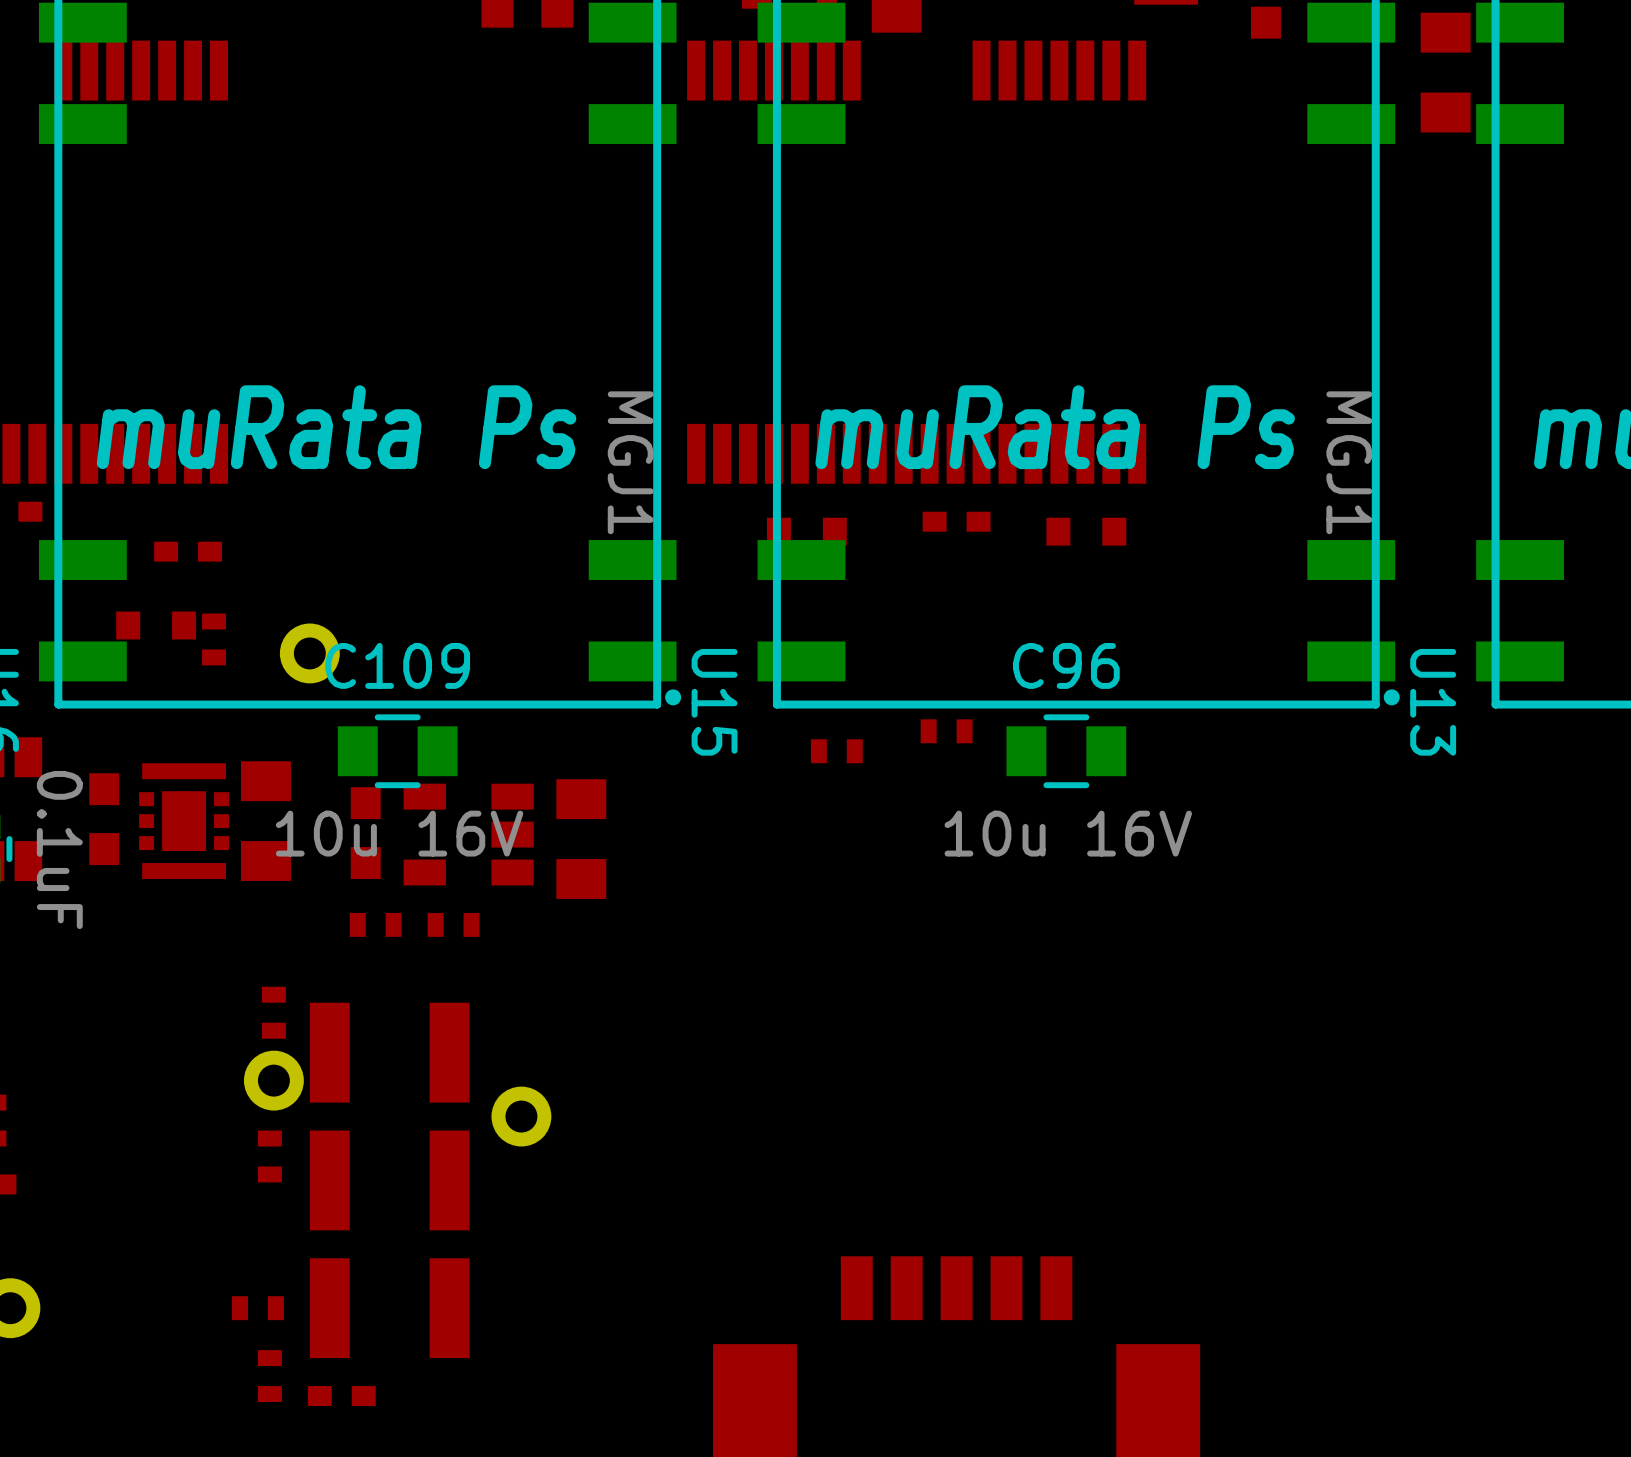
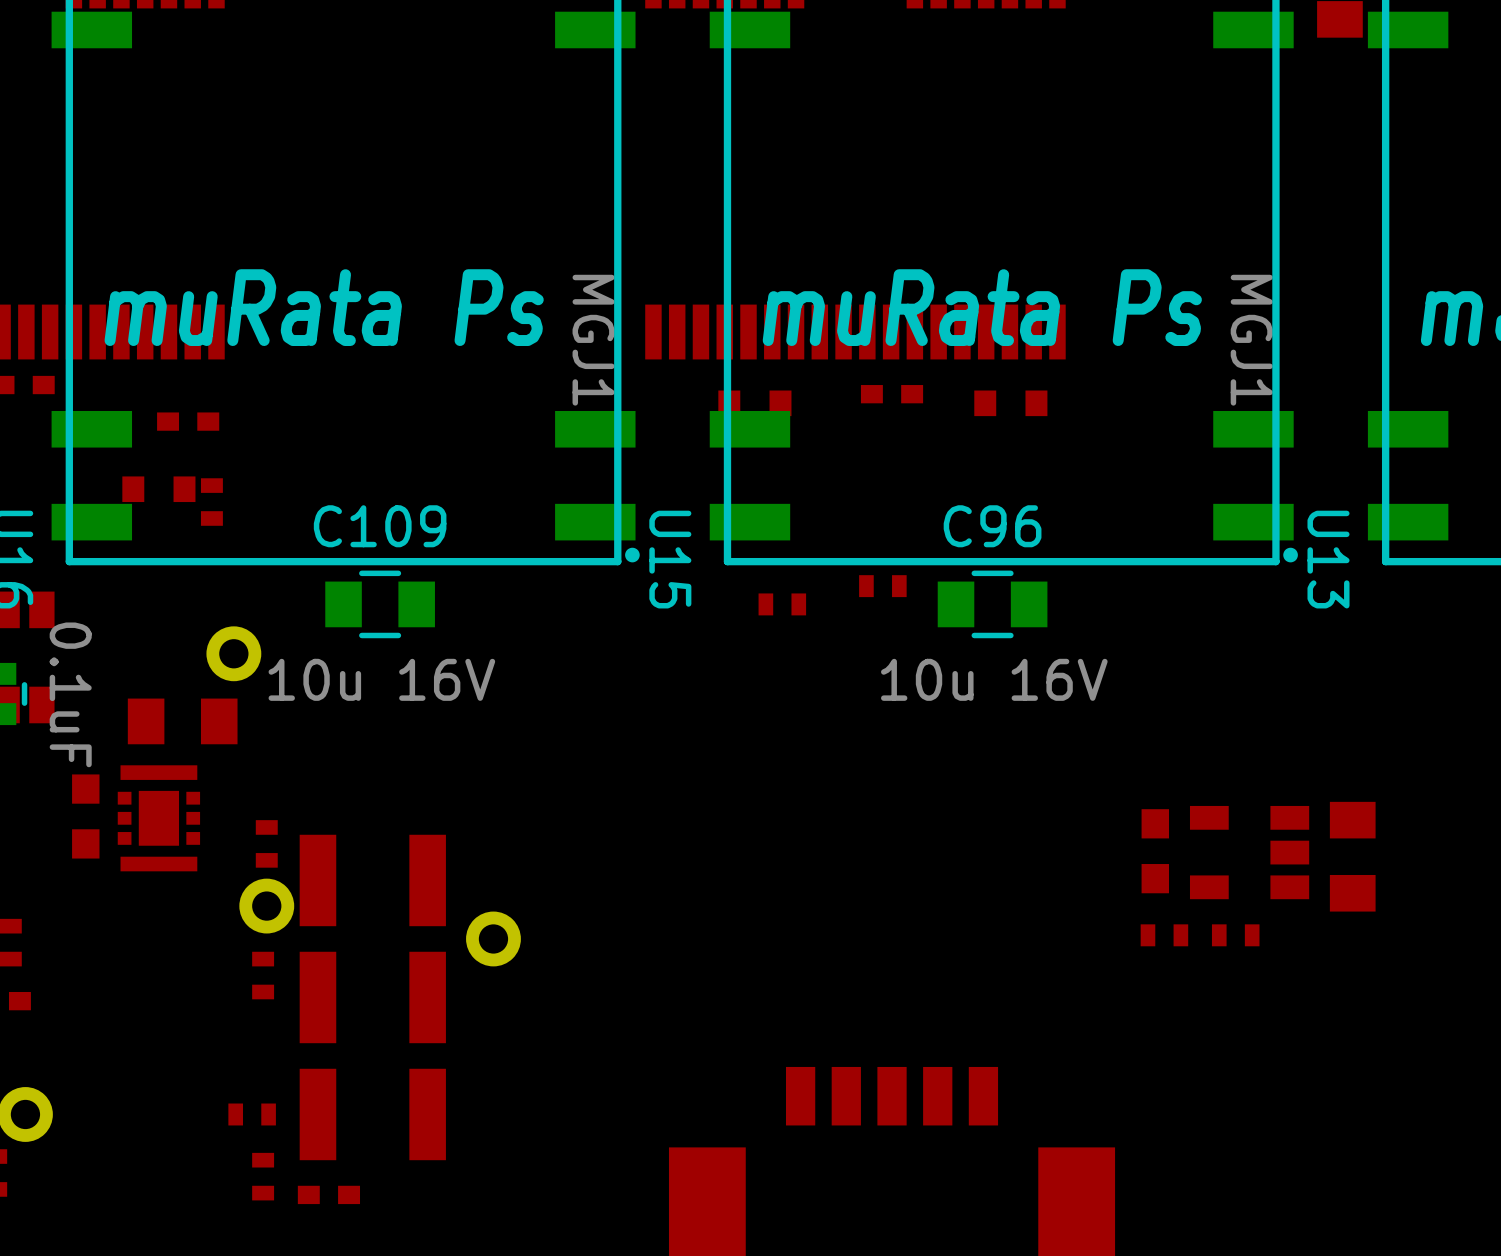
part position: (309, 653) -> (233, 653)
part: (104, 819) -> none
part position: (184, 821) -> (158, 818)
part rotation: 0° (265, 821) -> 90° clockwise (182, 721)
part position: (265, 821) -> (182, 721)
part: (365, 833) -> none
part position: (468, 834) -> (1249, 852)
part: (581, 839) -> none
part: (375, 924) -> none
part: (453, 924) -> none
part: none -> (85, 816)
part: none -> (1155, 851)
part: none -> (1352, 856)
part: none -> (1164, 935)
part: none -> (1235, 935)

